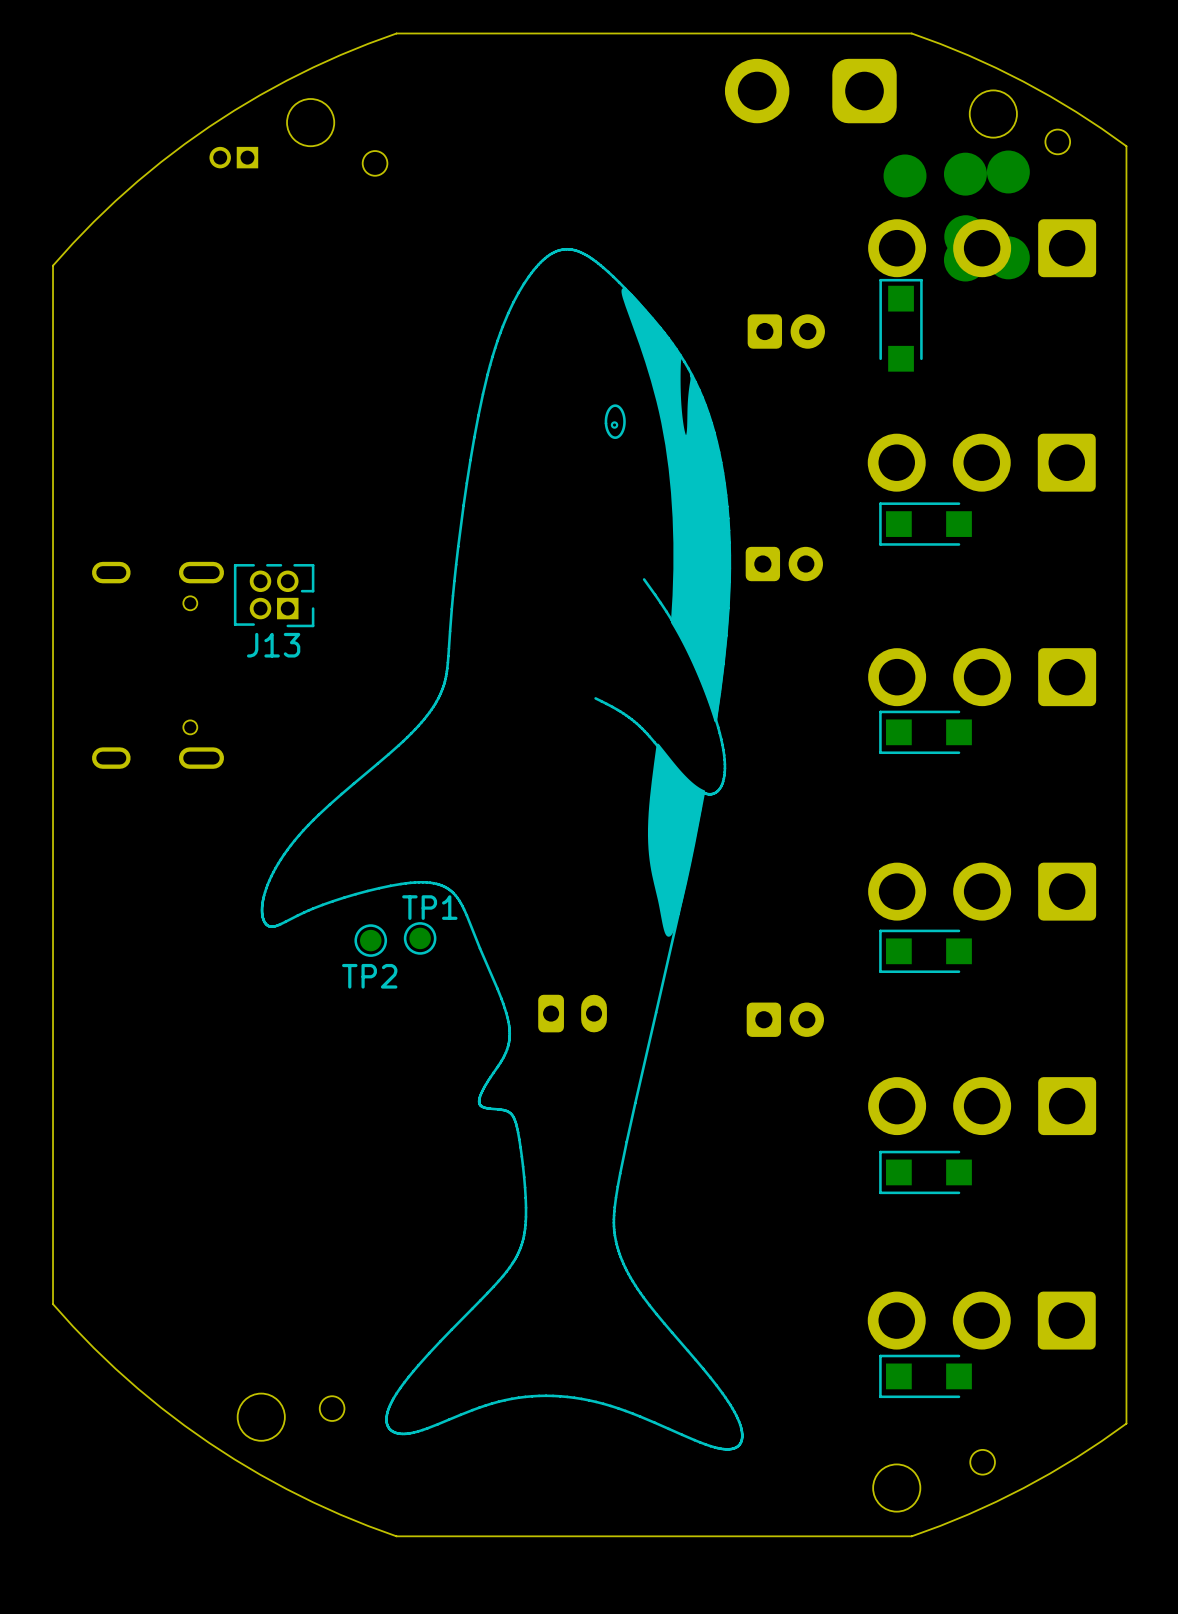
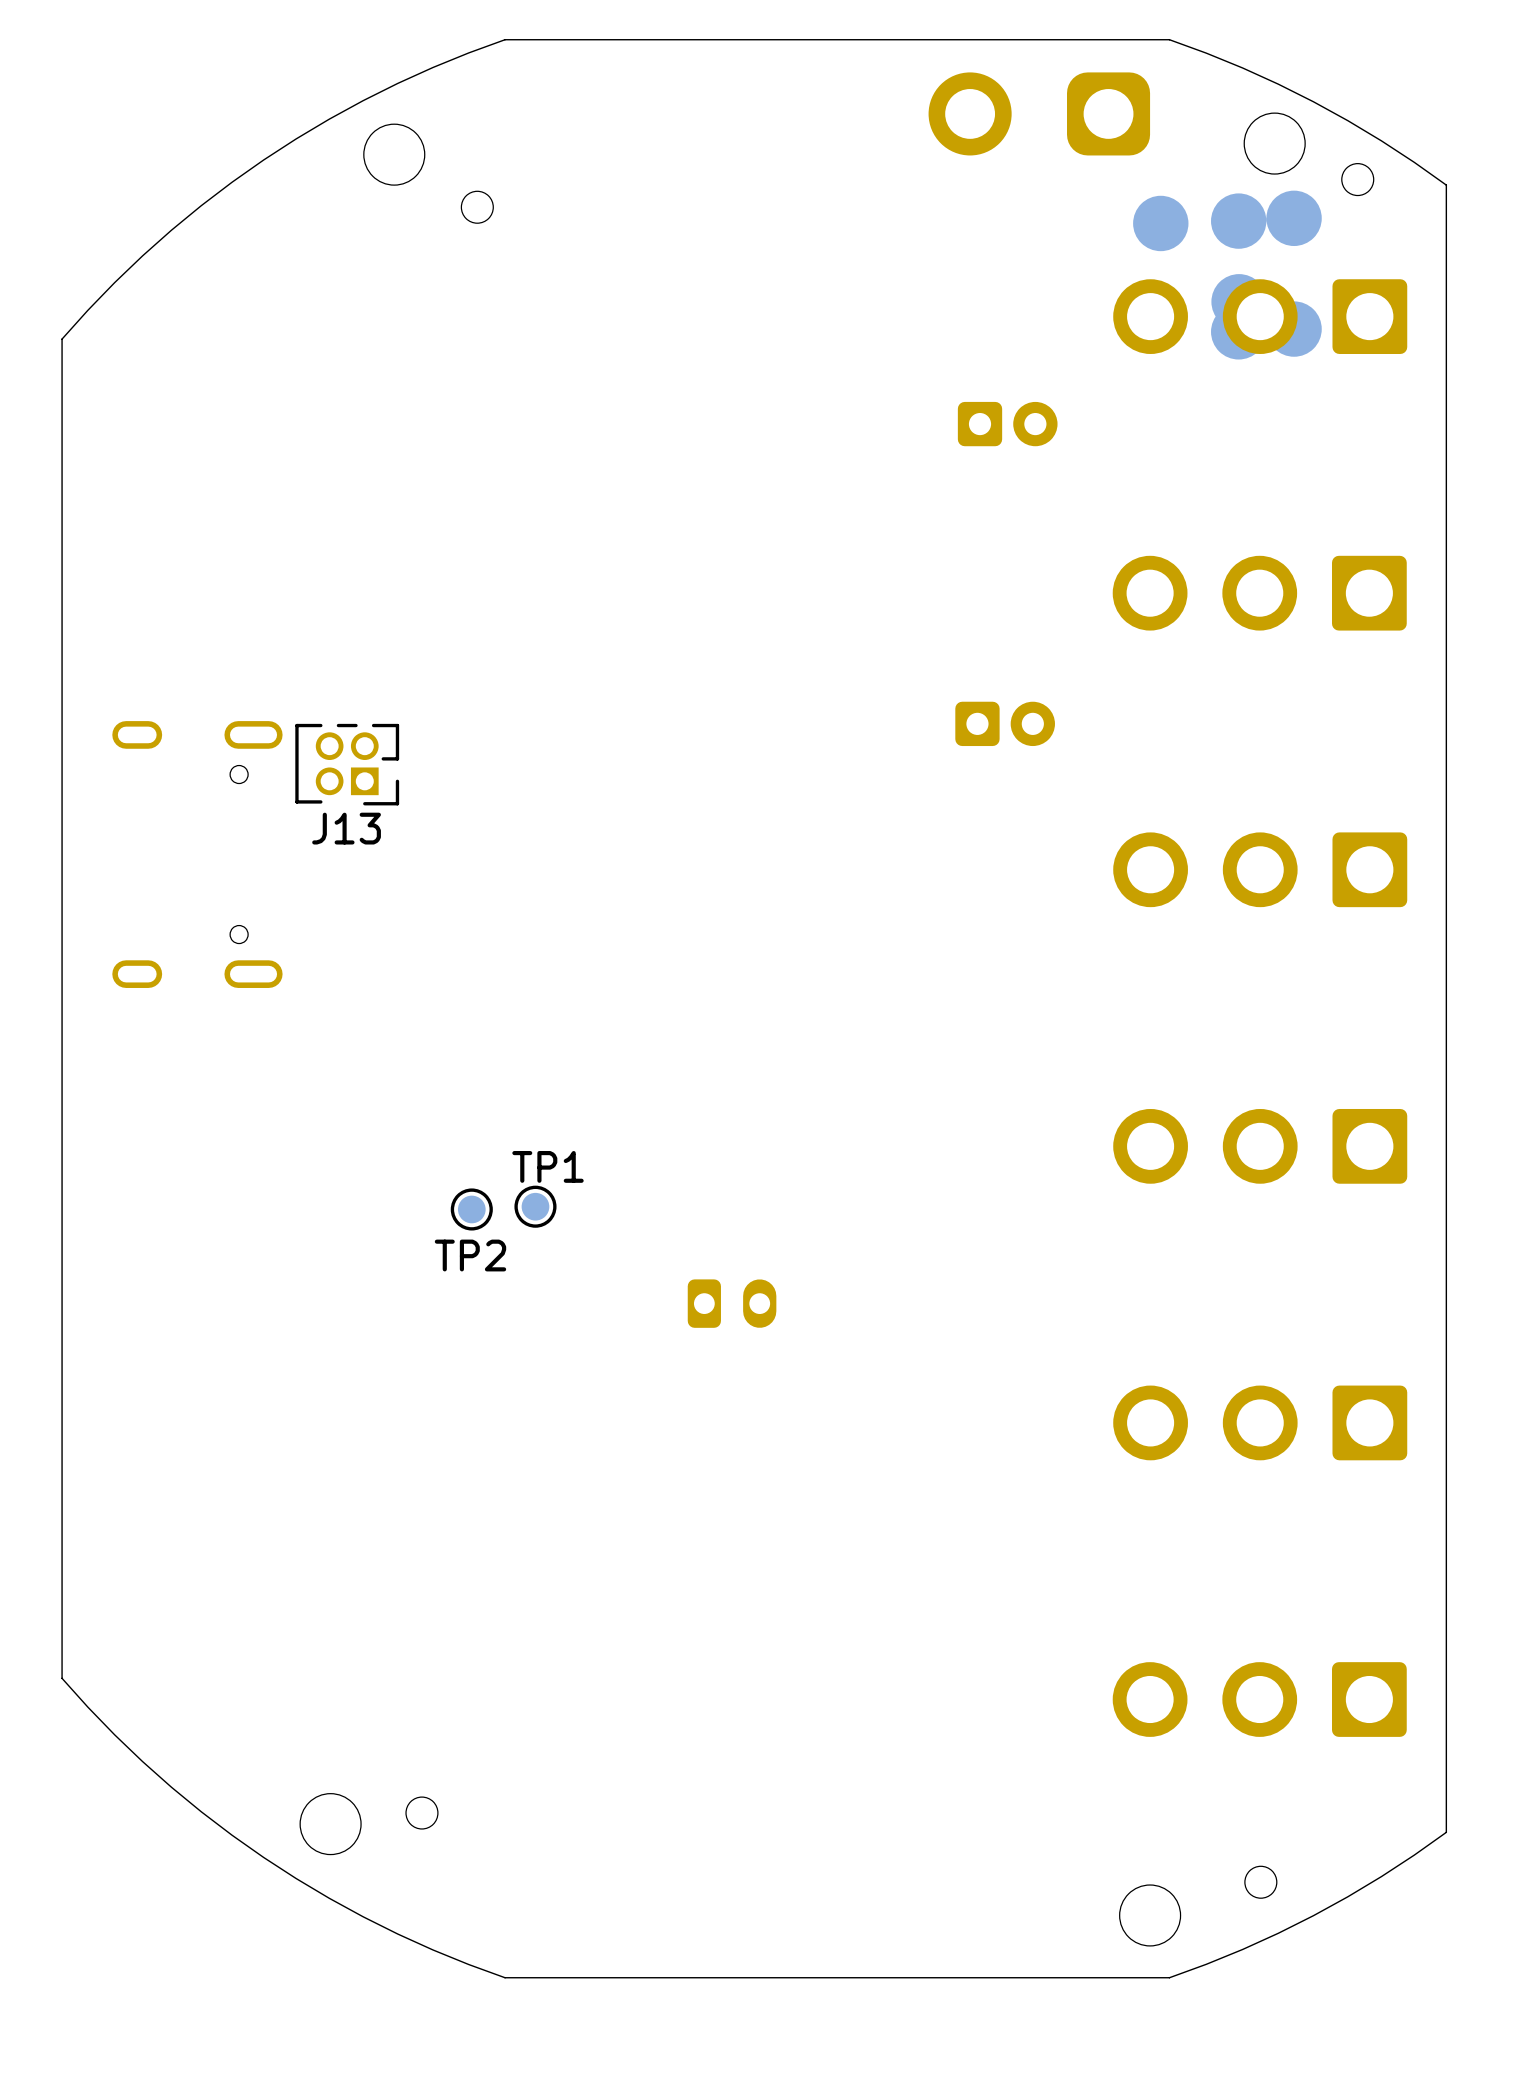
part: (233, 157) -> none
drawing: [260, 247, 744, 1451] -> none
part: (901, 325) -> none
part: (925, 524) -> none
part: (925, 732) -> none
part: (925, 951) -> none
part: (785, 1019) -> none
part: (925, 1172) -> none
part: (925, 1376) -> none

